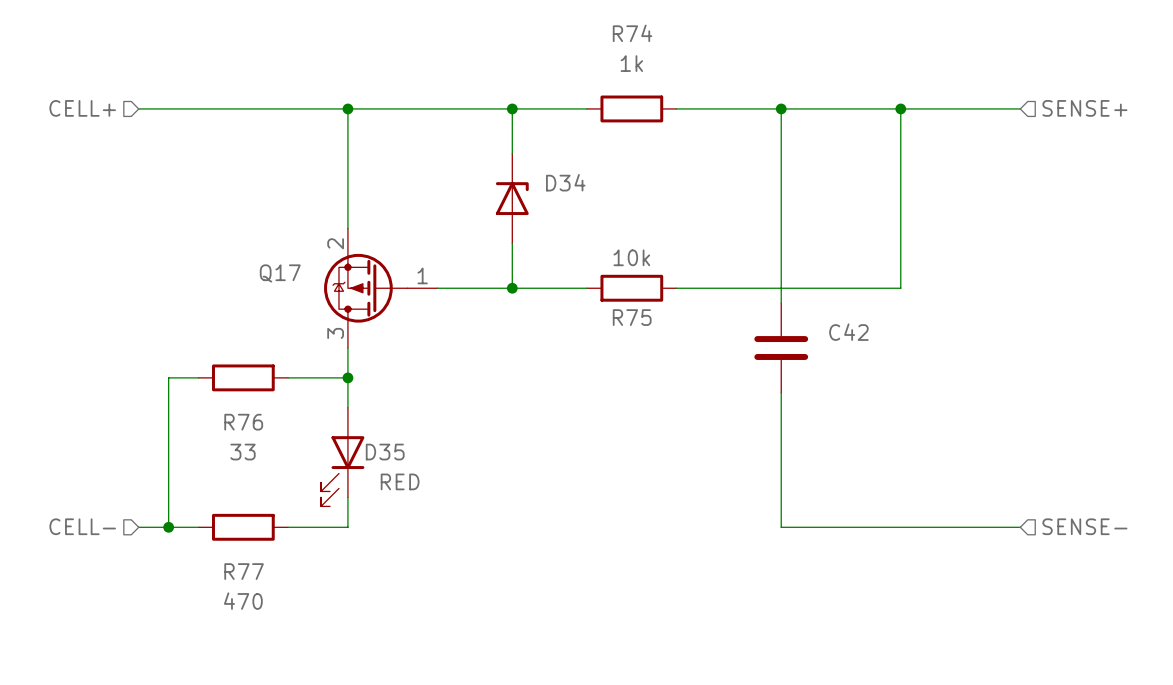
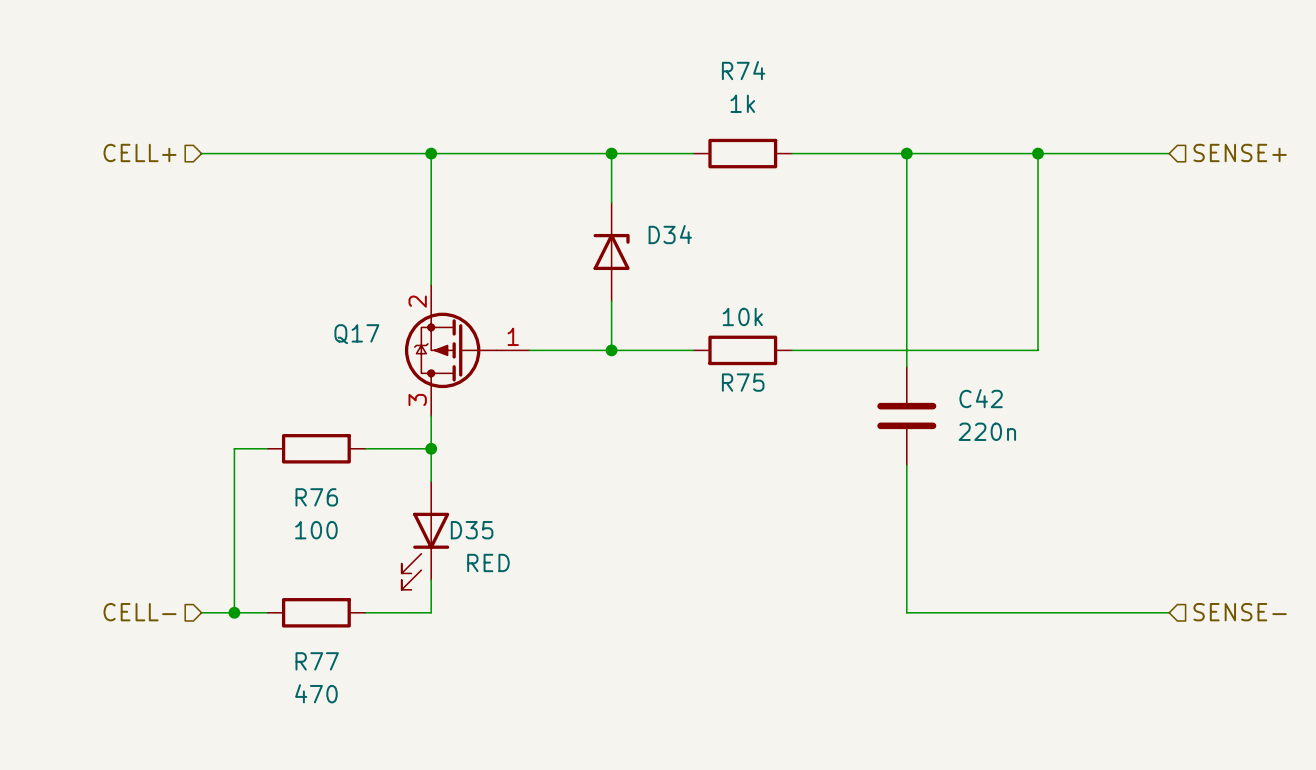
C42 value: none -> 220n (987, 431)
R76 value: 33 (243, 452) -> 100 (316, 530)

